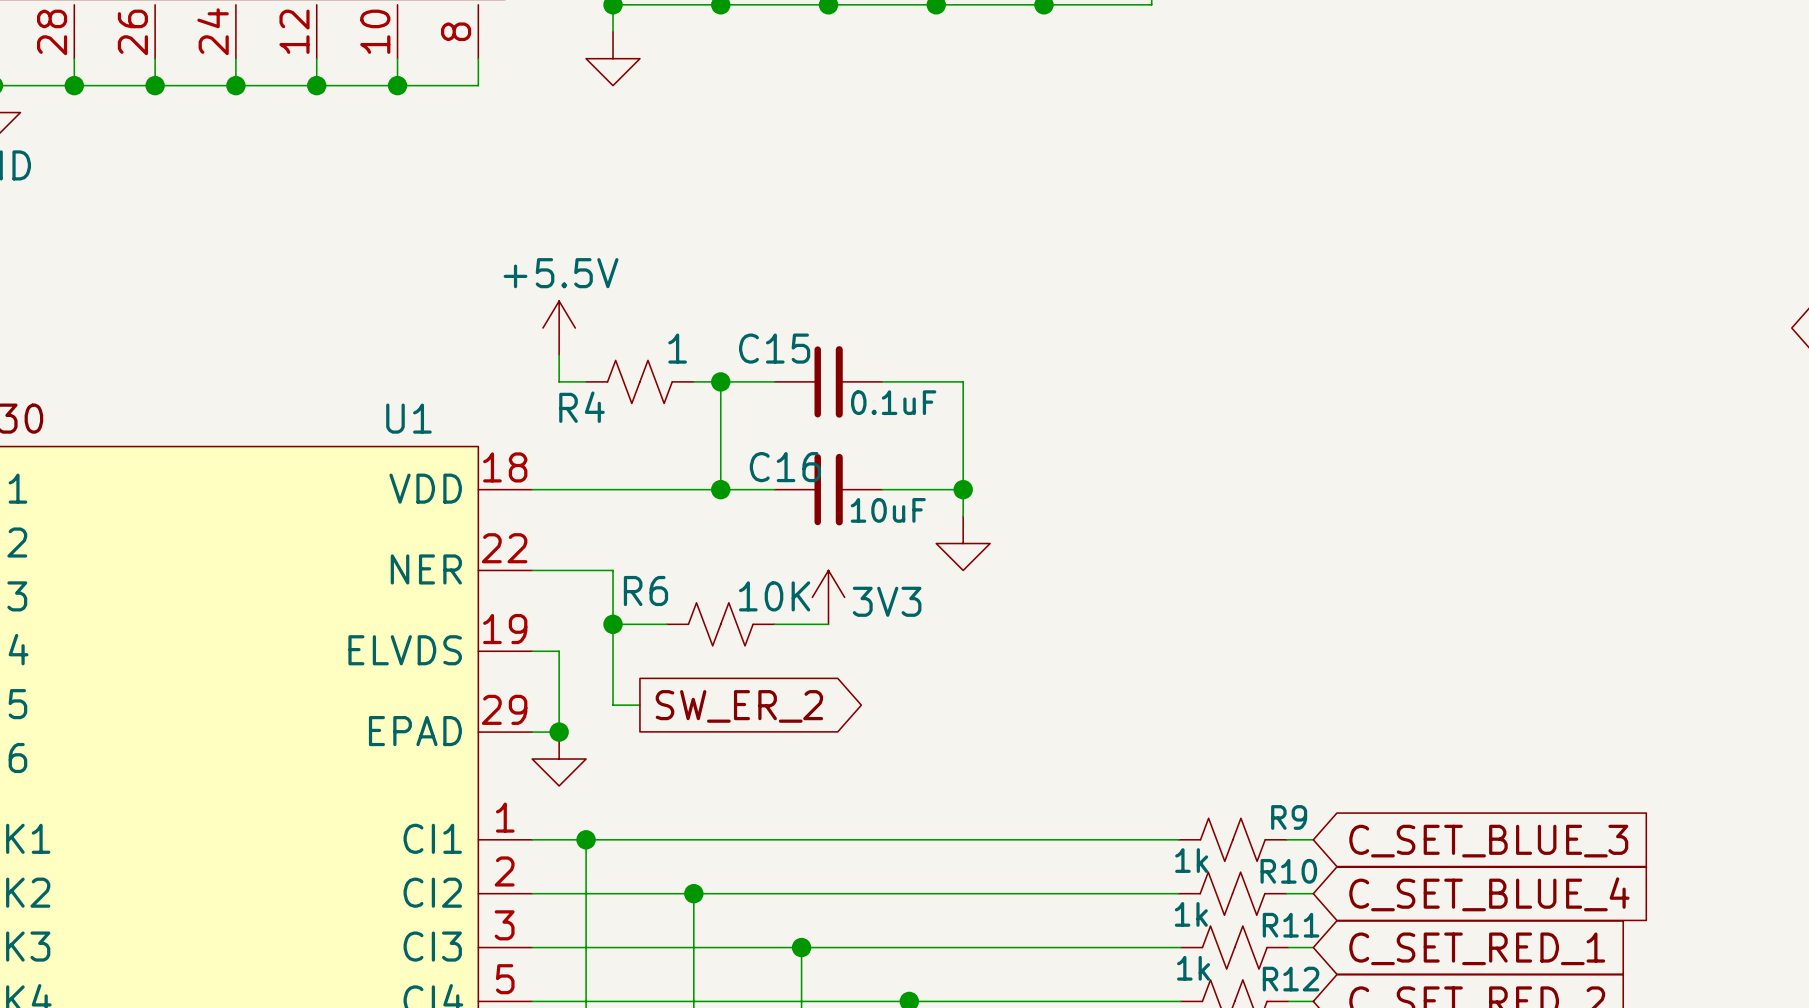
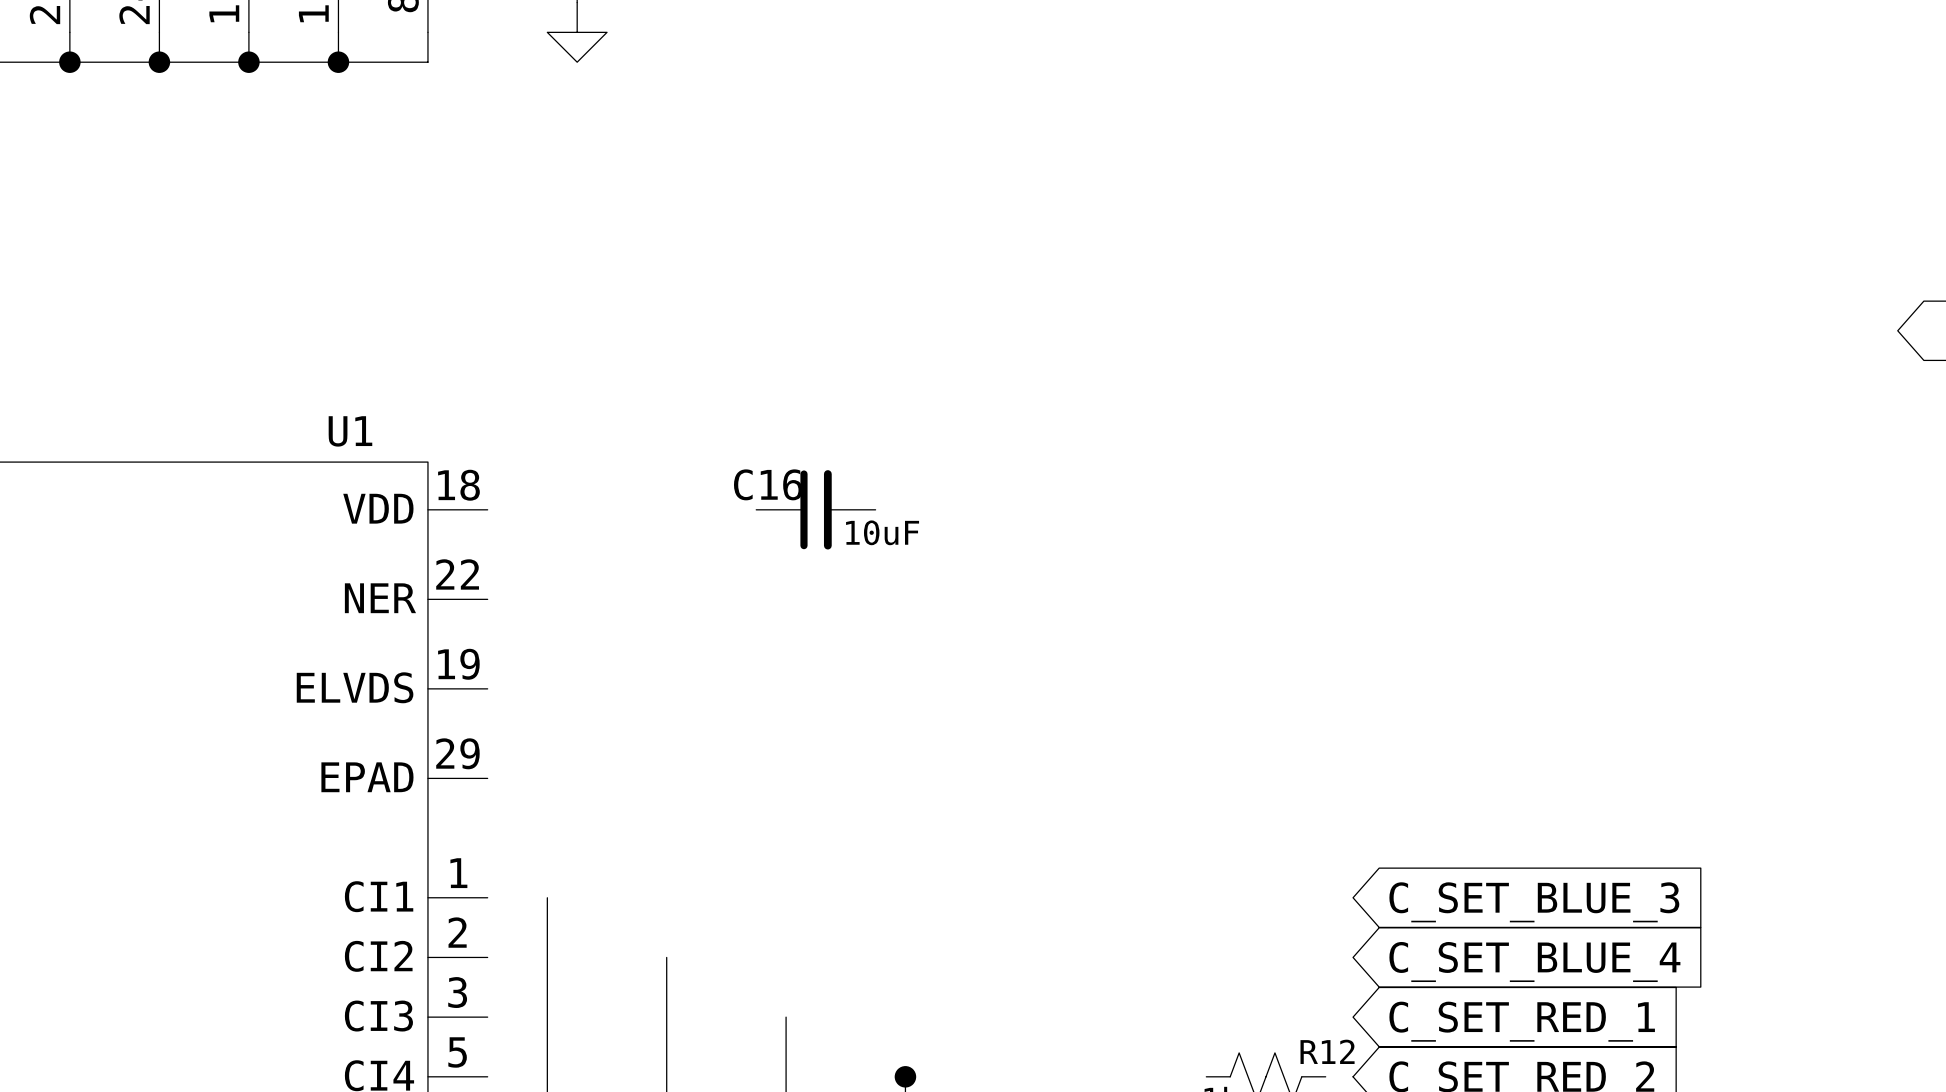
power symbol: +5.5V (559, 328) -> none
wire: (559, 354) (559, 381) (586, 381) -> none
R4: 1 (639, 381) -> none
wire: (693, 381) (774, 381) -> none
wire: (720, 381) (720, 489) -> none
junction: (720, 381) -> none
C15: 0.1uF (828, 381) -> none
wire: (882, 381) (963, 381) (963, 516) -> none
wire: (532, 489) (774, 489) -> none
junction: (720, 489) -> none
wire: (882, 489) (963, 489) -> none
junction: (963, 489) -> none
power symbol: (963, 543) -> none
wire: (532, 570) (613, 570) (613, 705) (639, 705) -> none
power symbol: 3V3 (828, 597) -> none
wire: (613, 624) (666, 624) -> none
junction: (613, 624) -> none
R6: 10K (720, 624) -> none
wire: (774, 624) (828, 624) -> none
wire: (532, 651) (559, 651) (559, 732) (532, 732) -> none
global label: SW_ER_2 (739, 706) -> none
junction: (559, 732) -> none
power symbol: (559, 759) -> none
wire: (532, 839) (1178, 839) -> none
junction: (586, 839) -> none
R9: 1k (1232, 839) -> none
wire: (1286, 839) (1313, 839) -> none
wire: (532, 893) (1178, 893) -> none
junction: (693, 893) -> none
R10: 1k (1232, 893) -> none
wire: (1286, 893) (1313, 893) -> none
wire: (532, 947) (1180, 947) -> none
junction: (801, 947) -> none
R11: 1k (1234, 947) -> none
wire: (1288, 947) (1313, 947) -> none
wire: (532, 1001) (1180, 1001) -> none
wire: (1288, 1001) (1313, 1001) -> none

